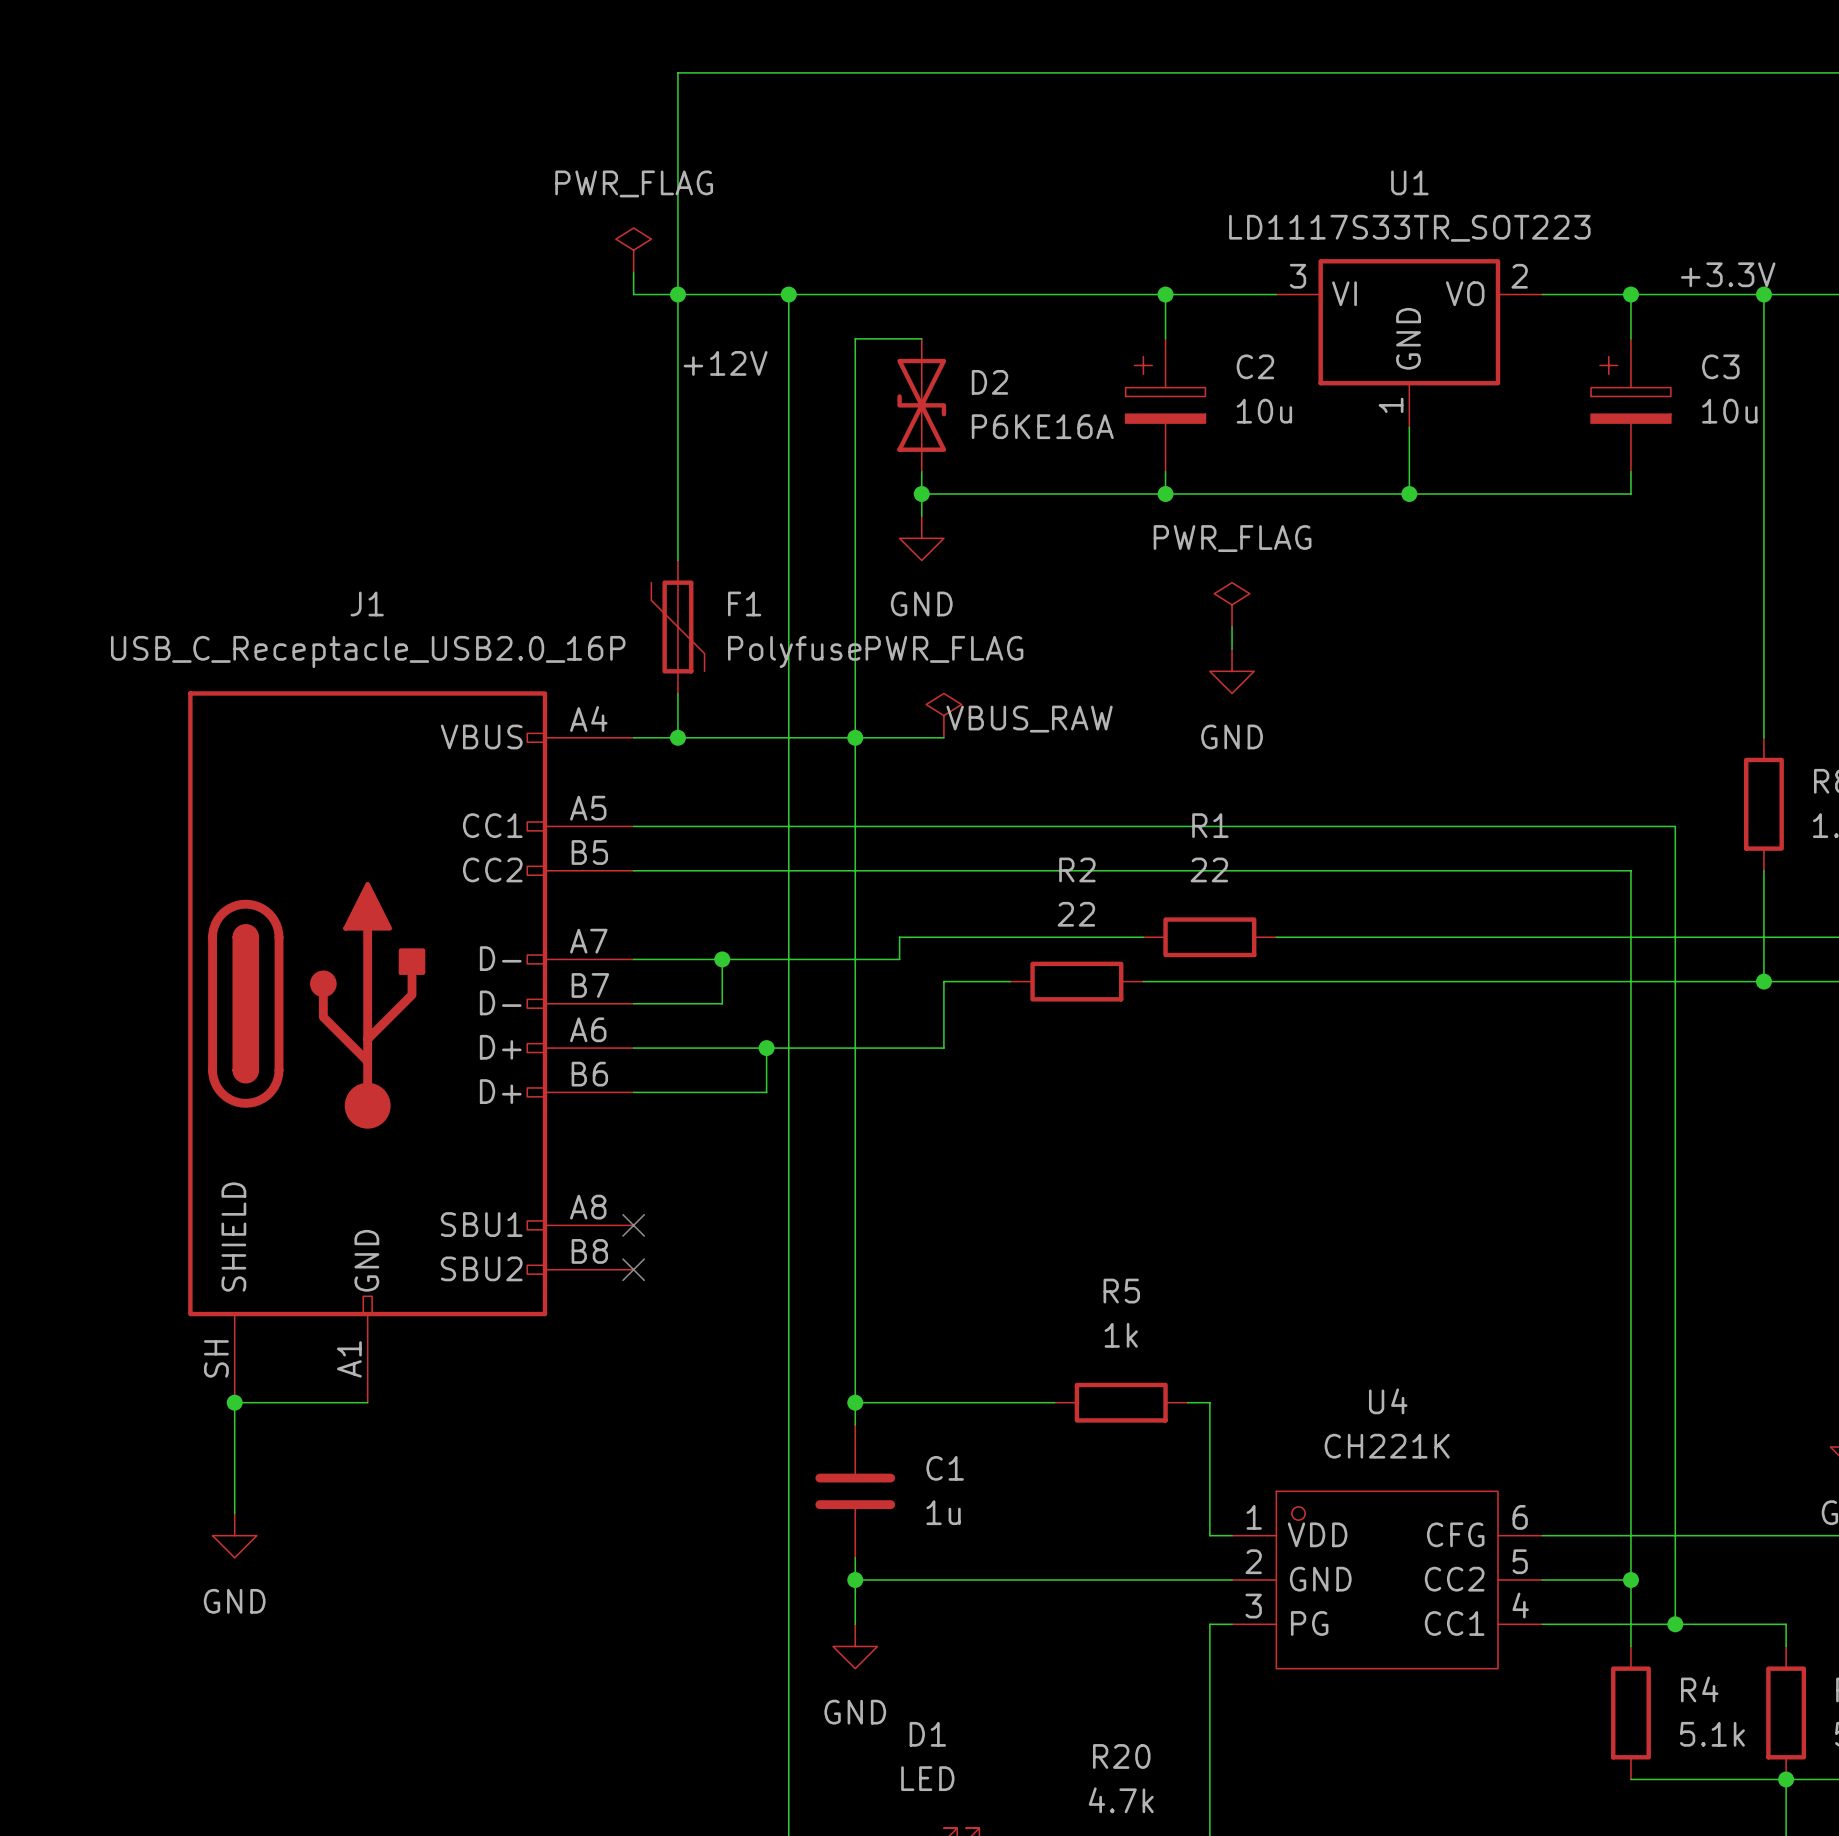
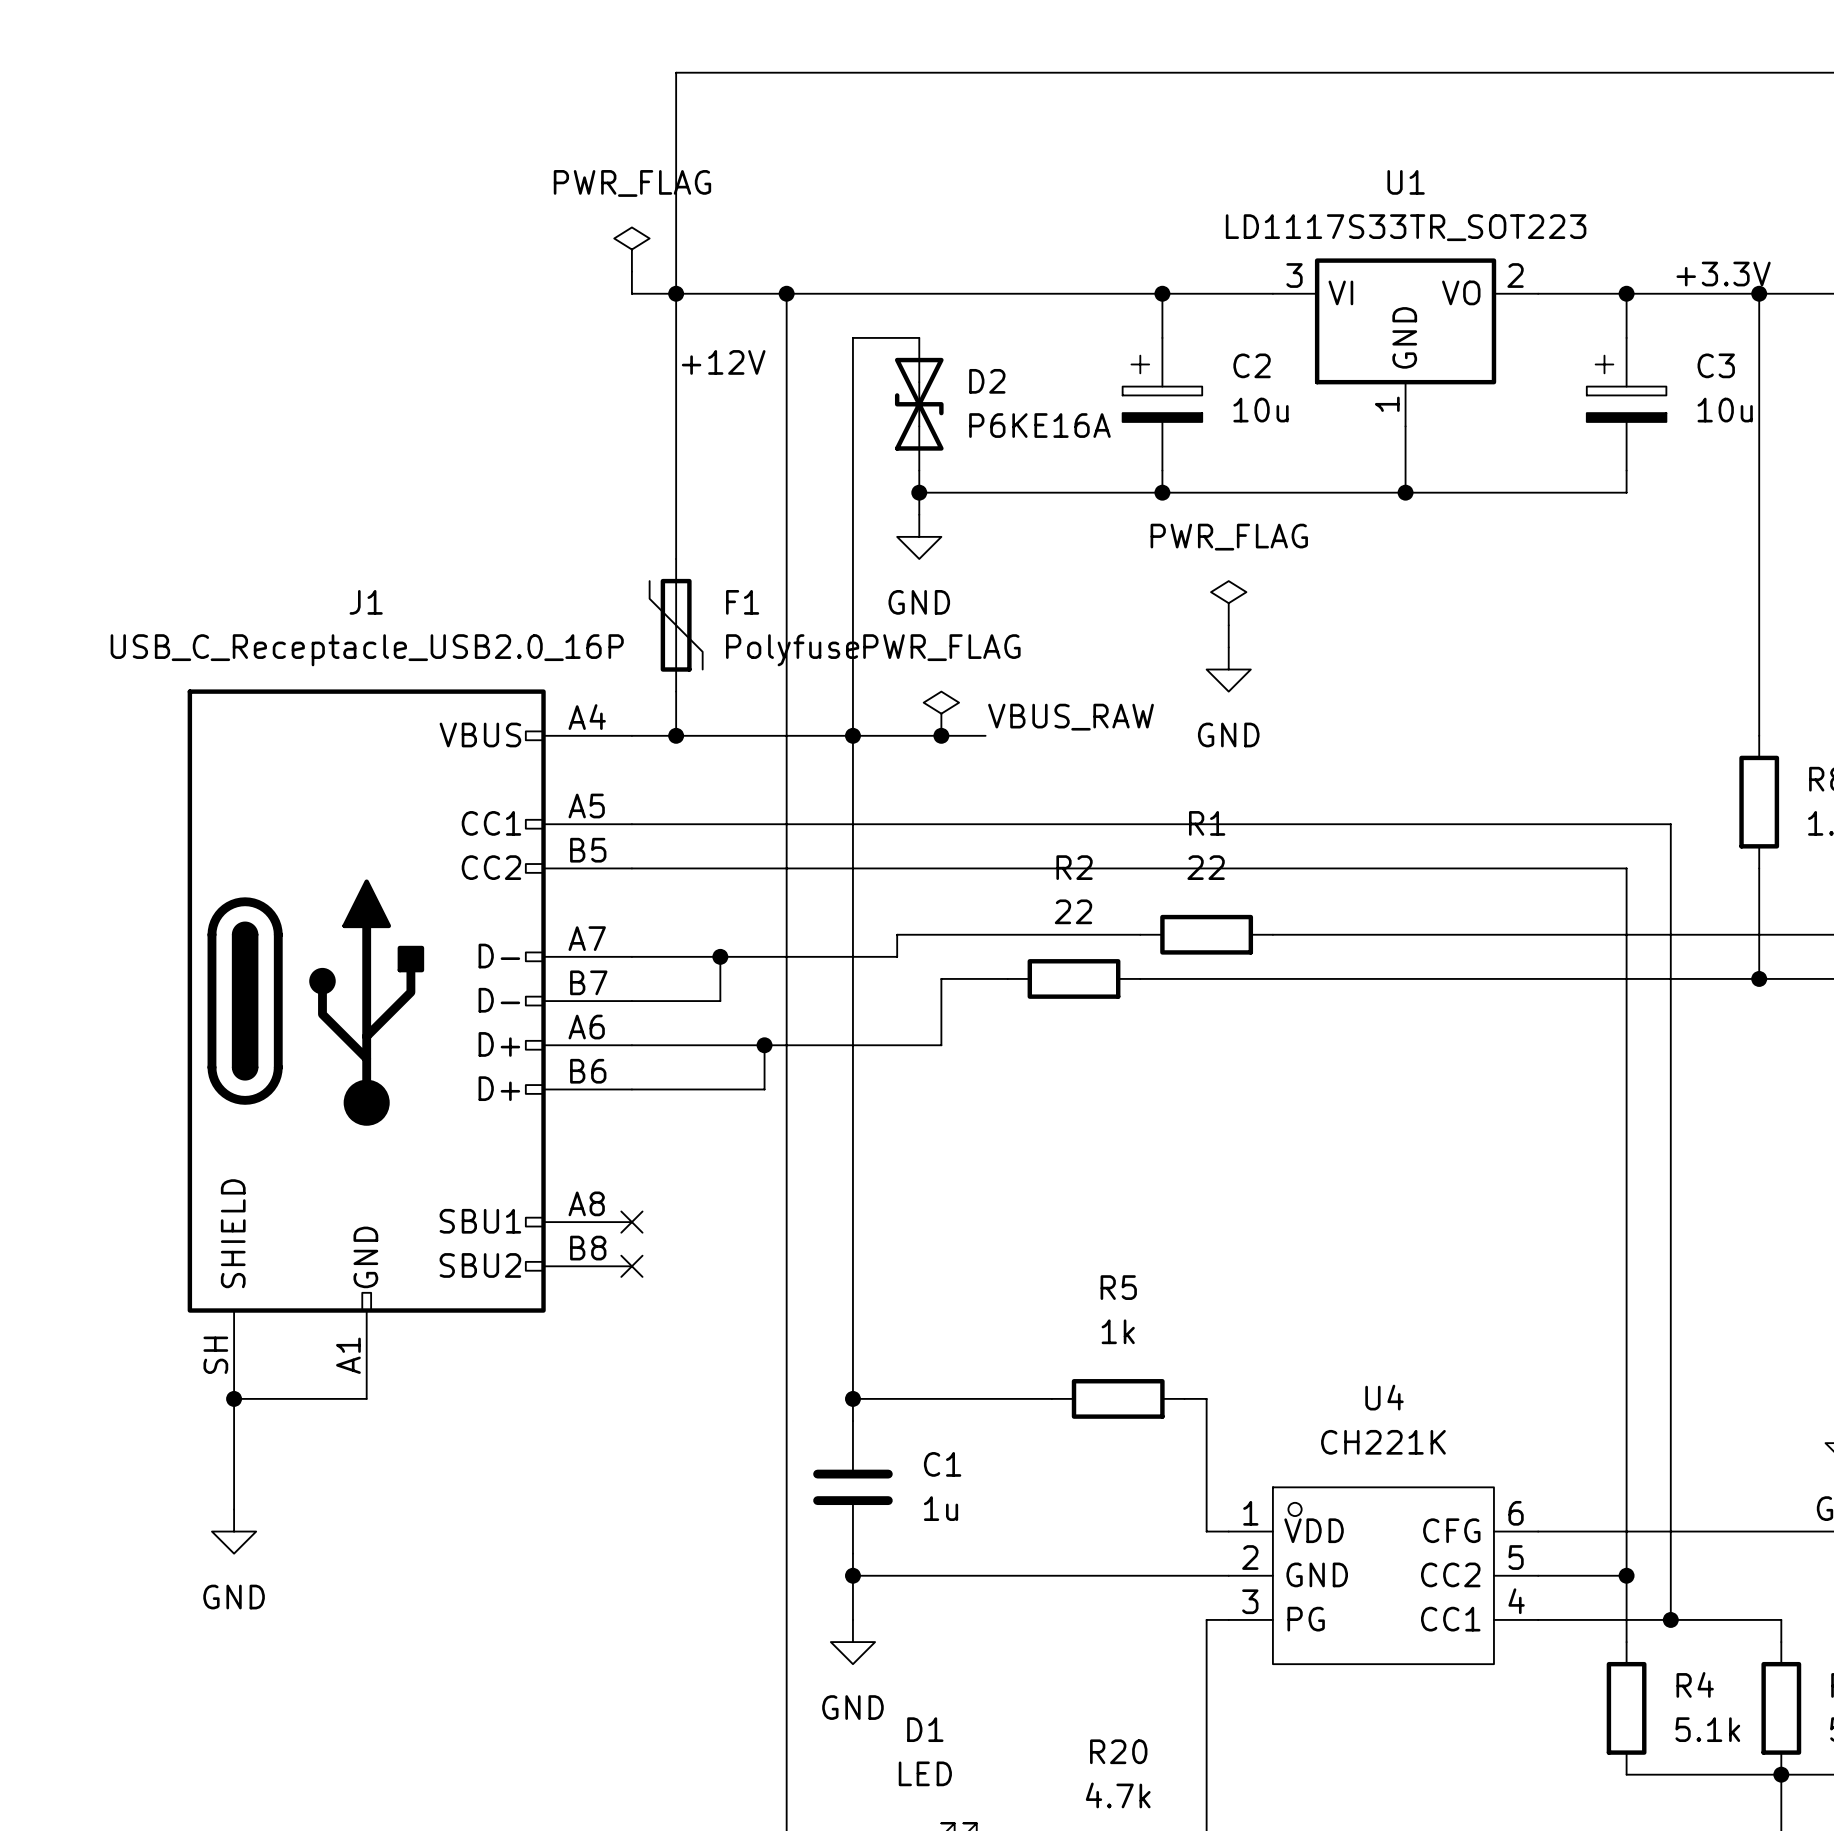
label position: VBUS_RAW (1029, 719) -> VBUS_RAW (1071, 717)
wire: none -> (941, 735) (985, 735)
junction: none -> (941, 735)

